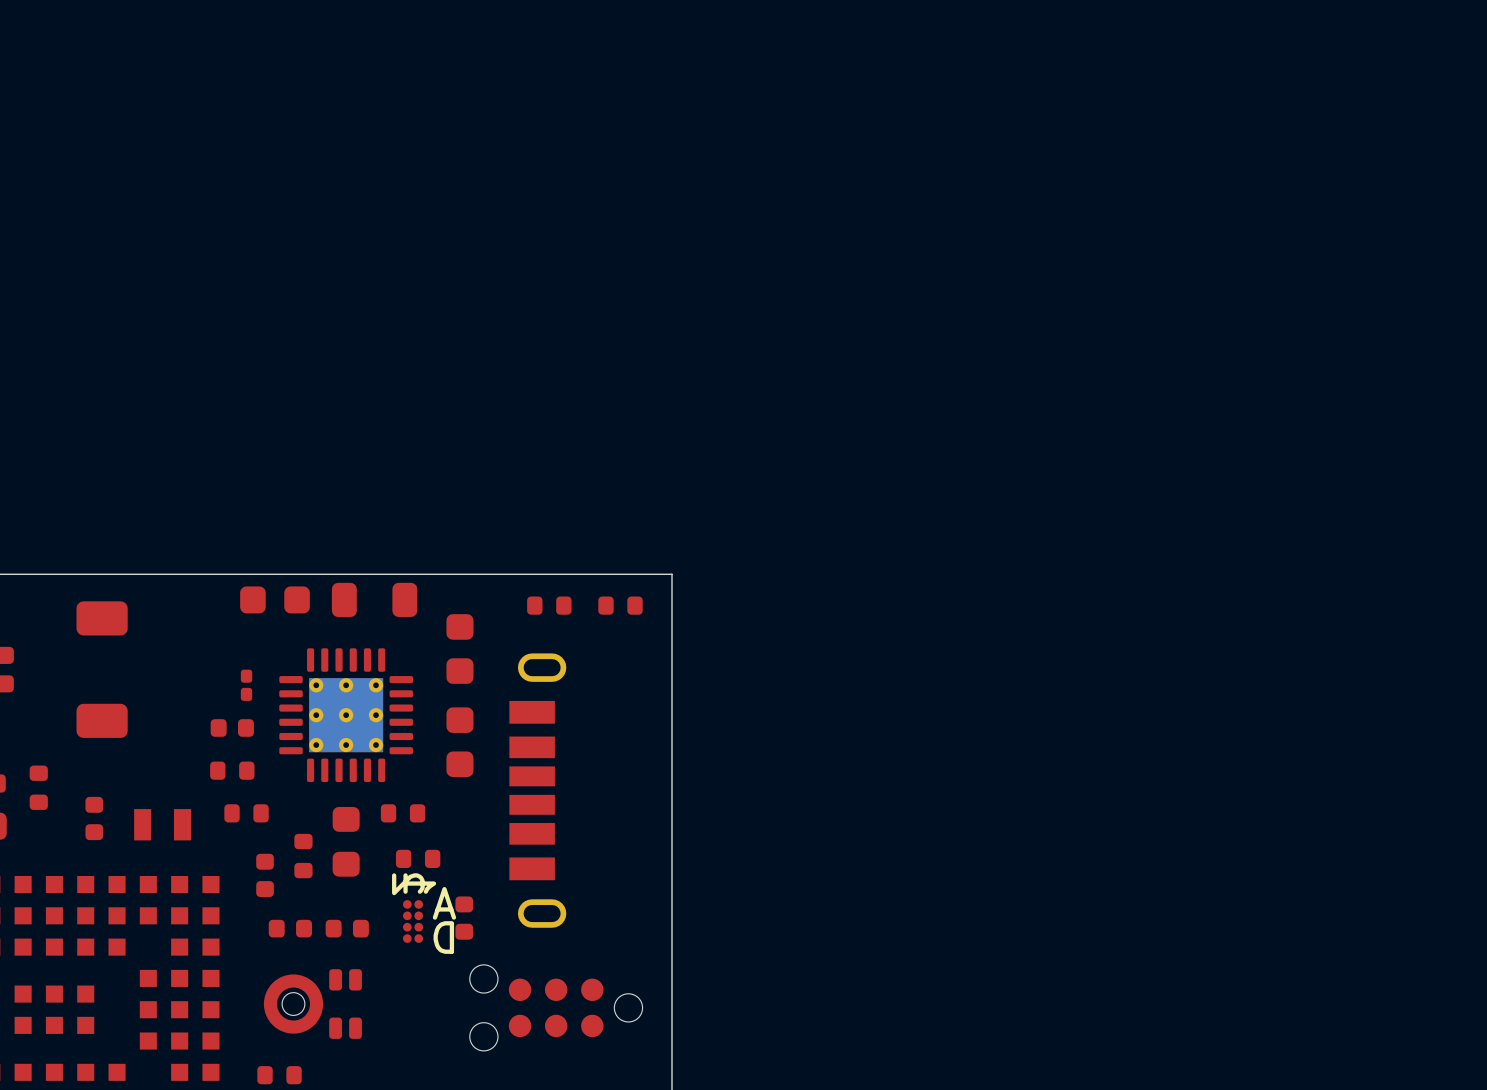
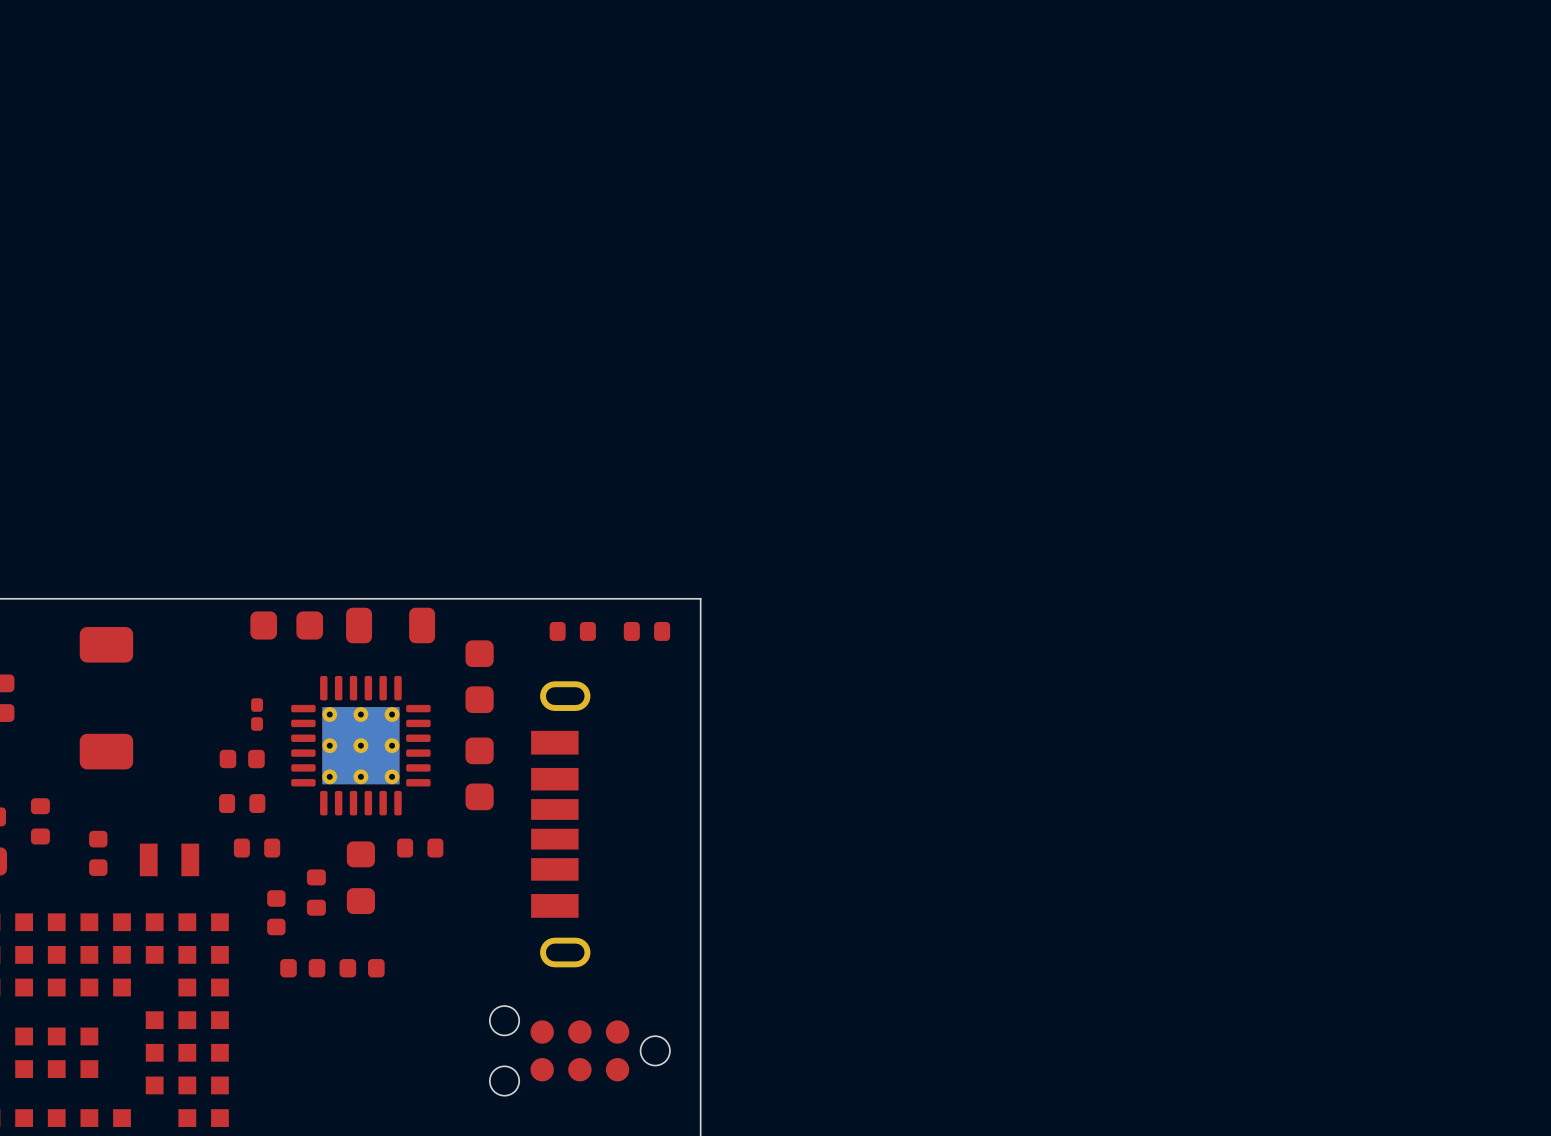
part: (418, 858) -> none
part: (464, 918) -> none
part: (413, 921) -> none
part: (312, 1004) -> none
part: (279, 1075) -> none

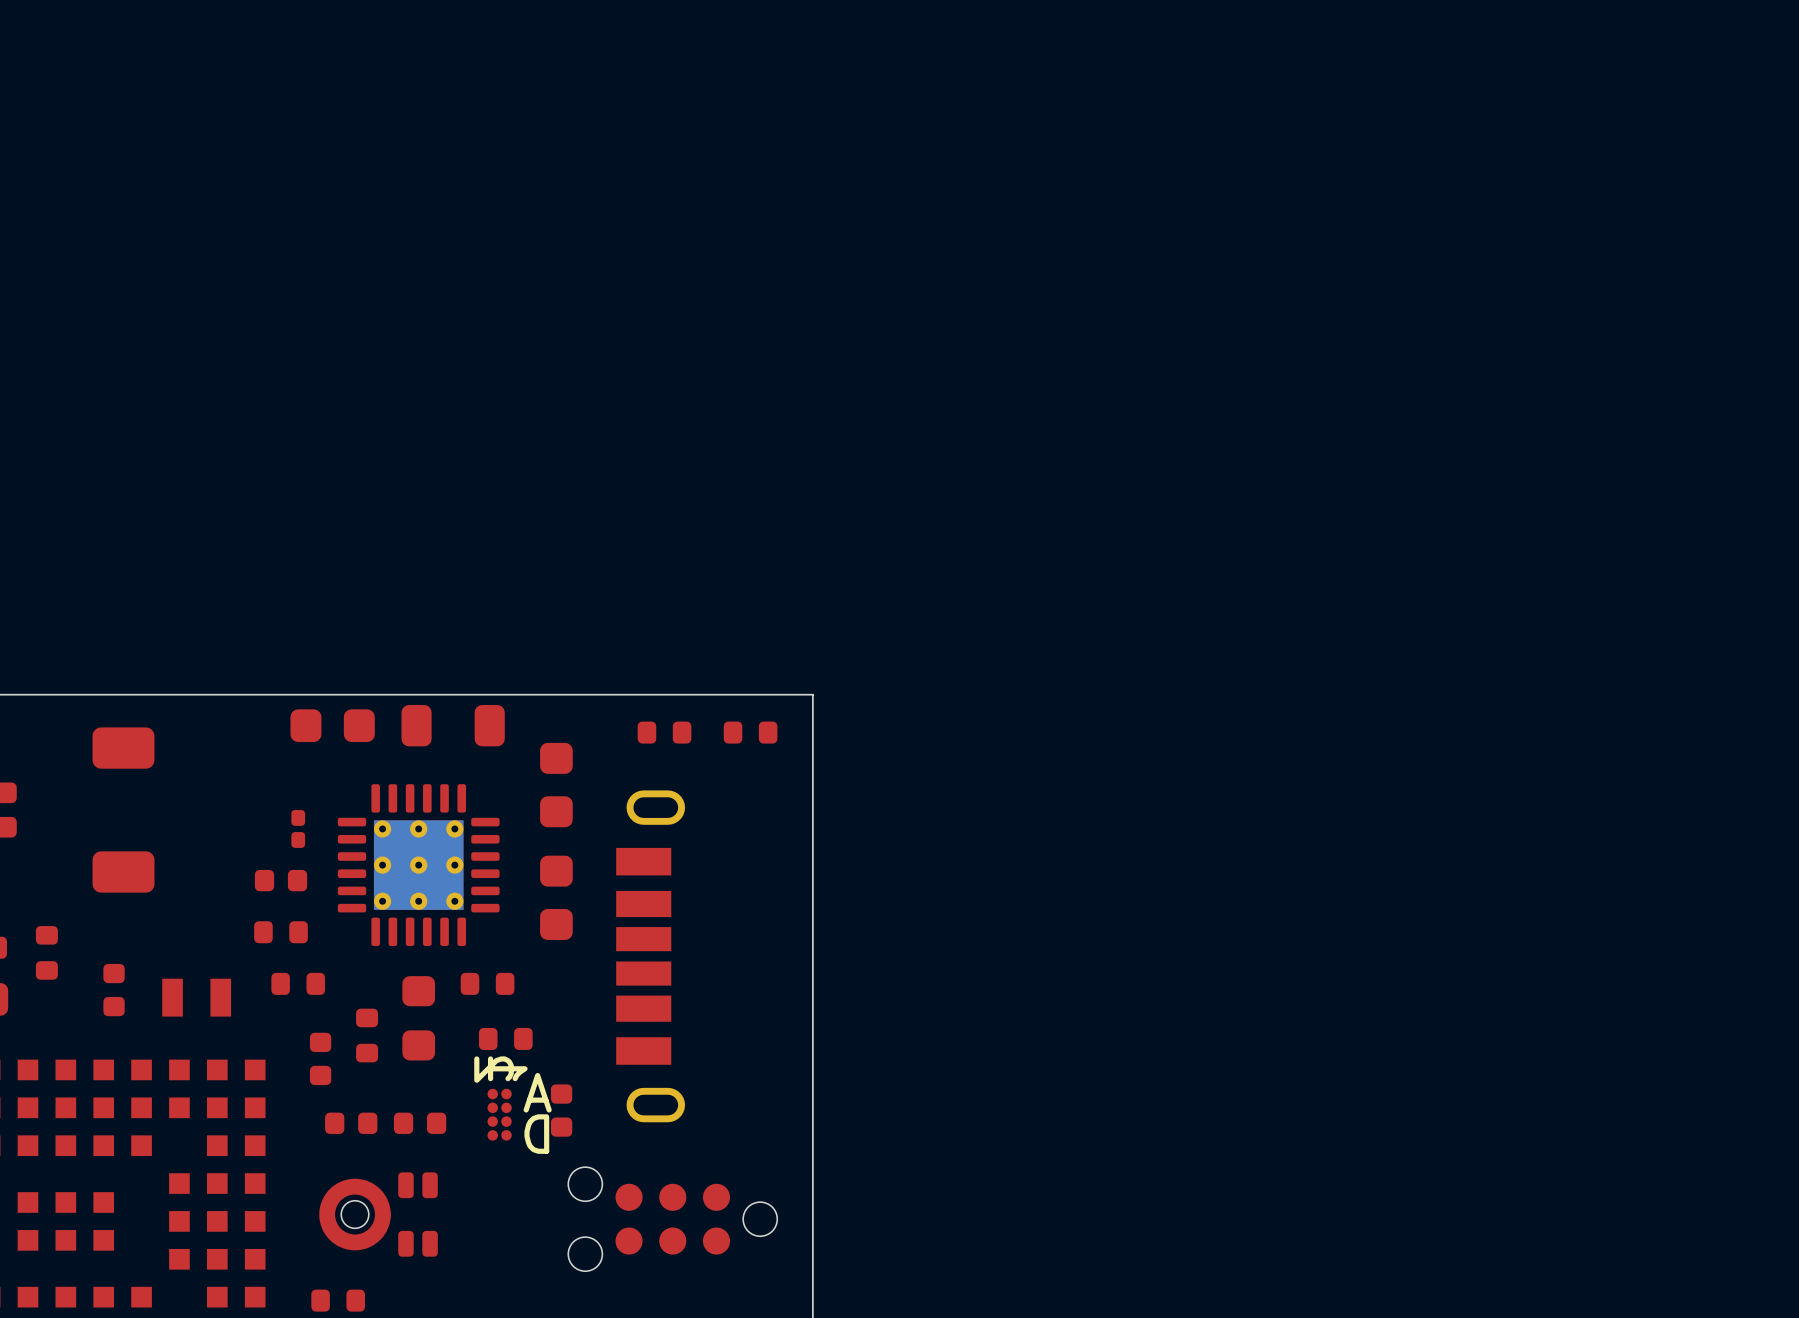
part: none -> (505, 1038)
part: none -> (561, 1110)
part: none -> (499, 1114)
part: none -> (378, 1214)
part: none -> (338, 1300)

